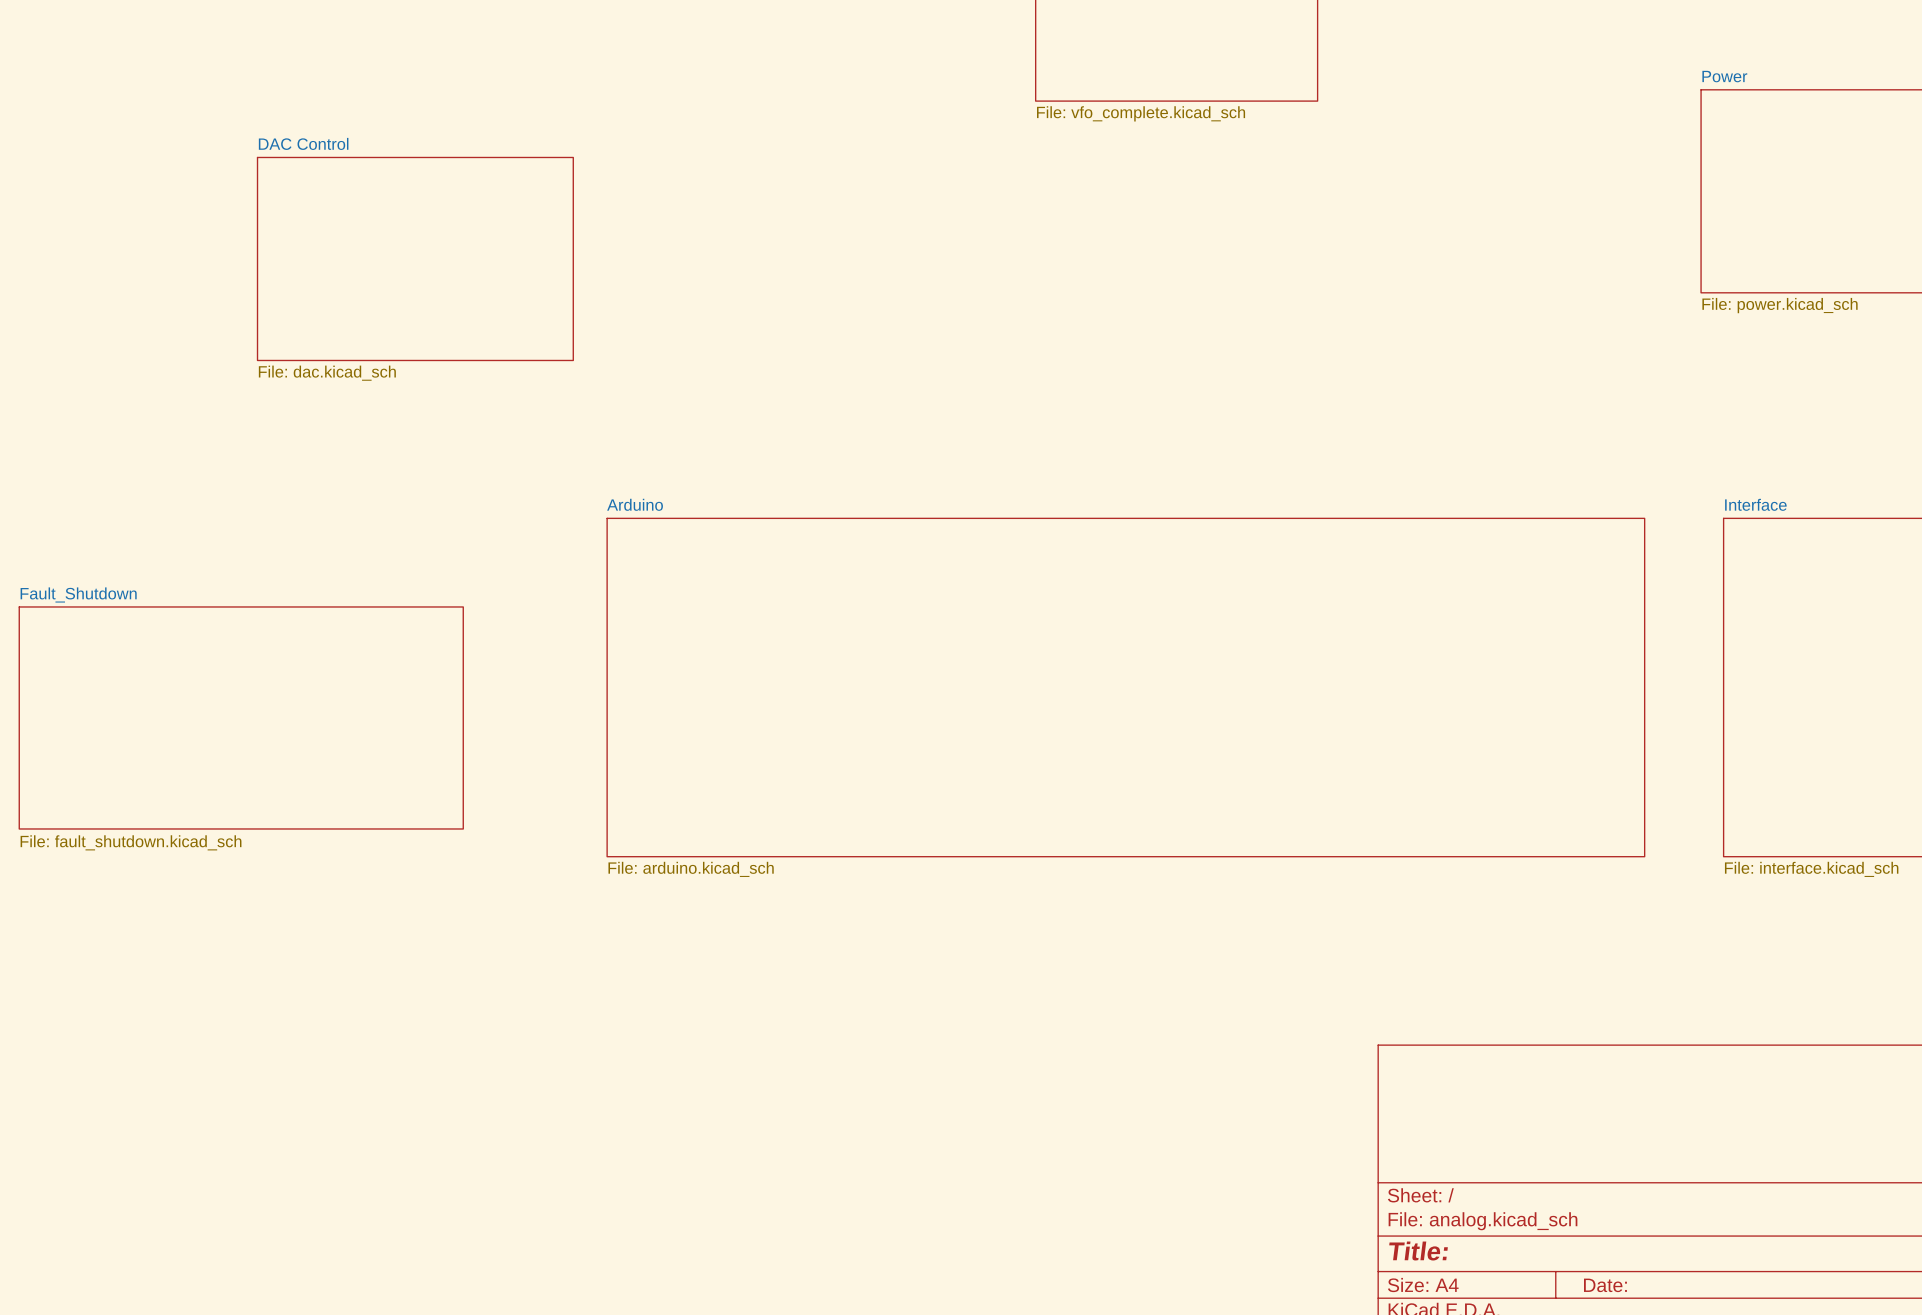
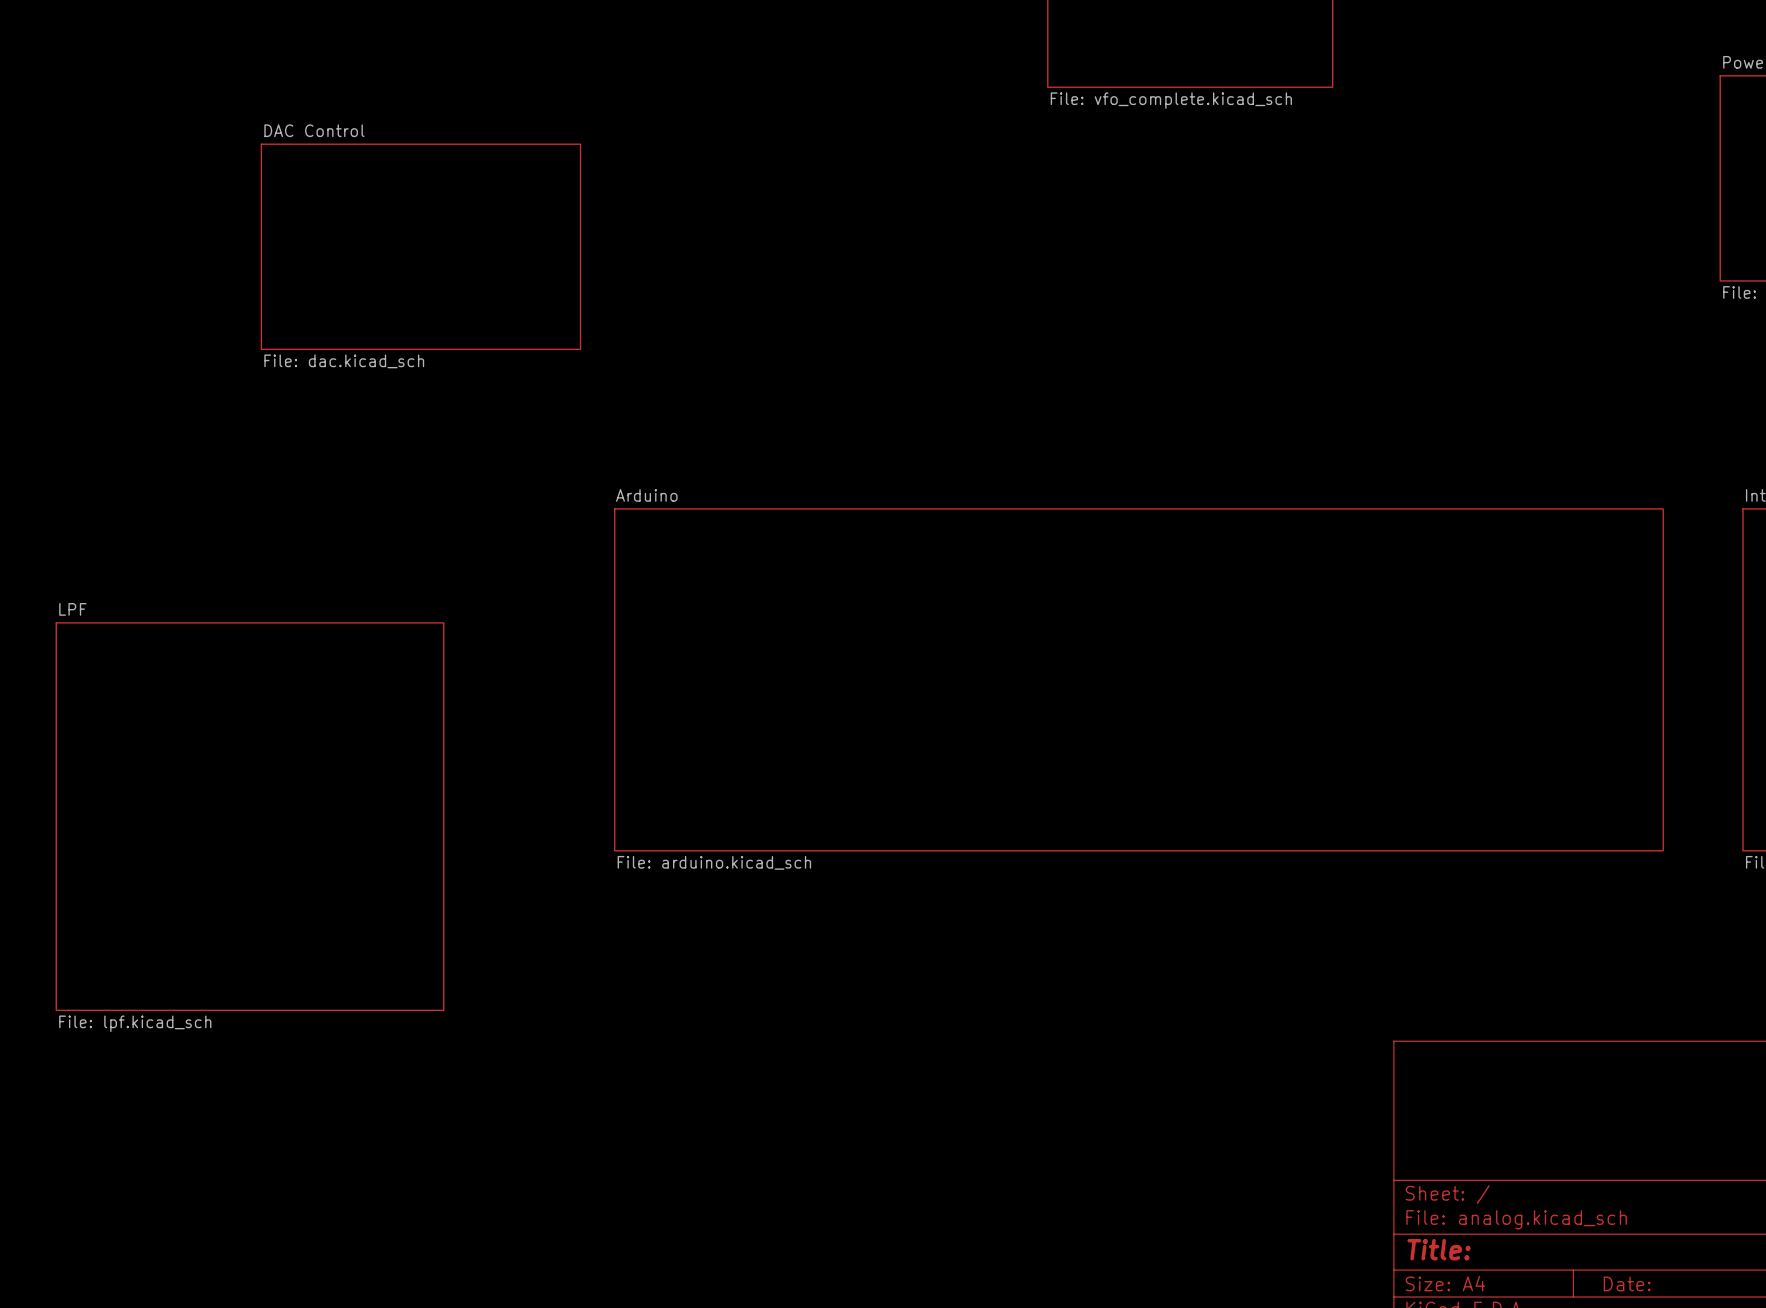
sheet Fault_Shutdown: File: fault_shutdown.kicad_sch (241, 717) -> none
sheet LPF: none -> File: lpf.kicad_sch (250, 816)

